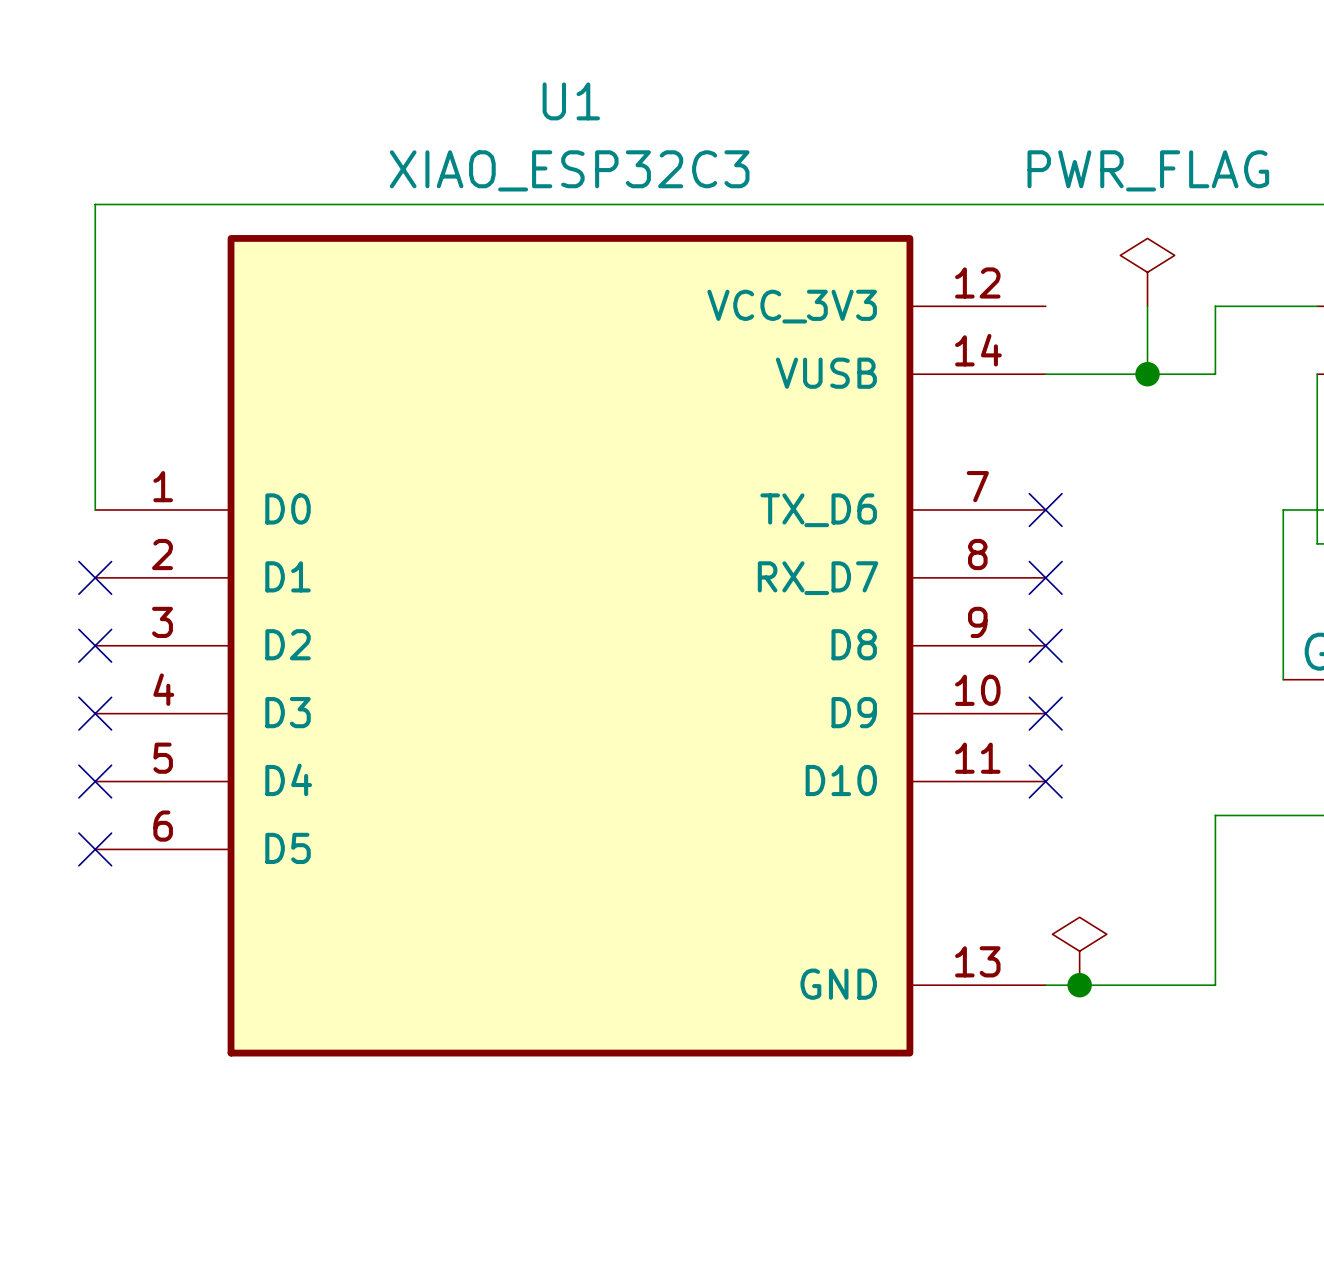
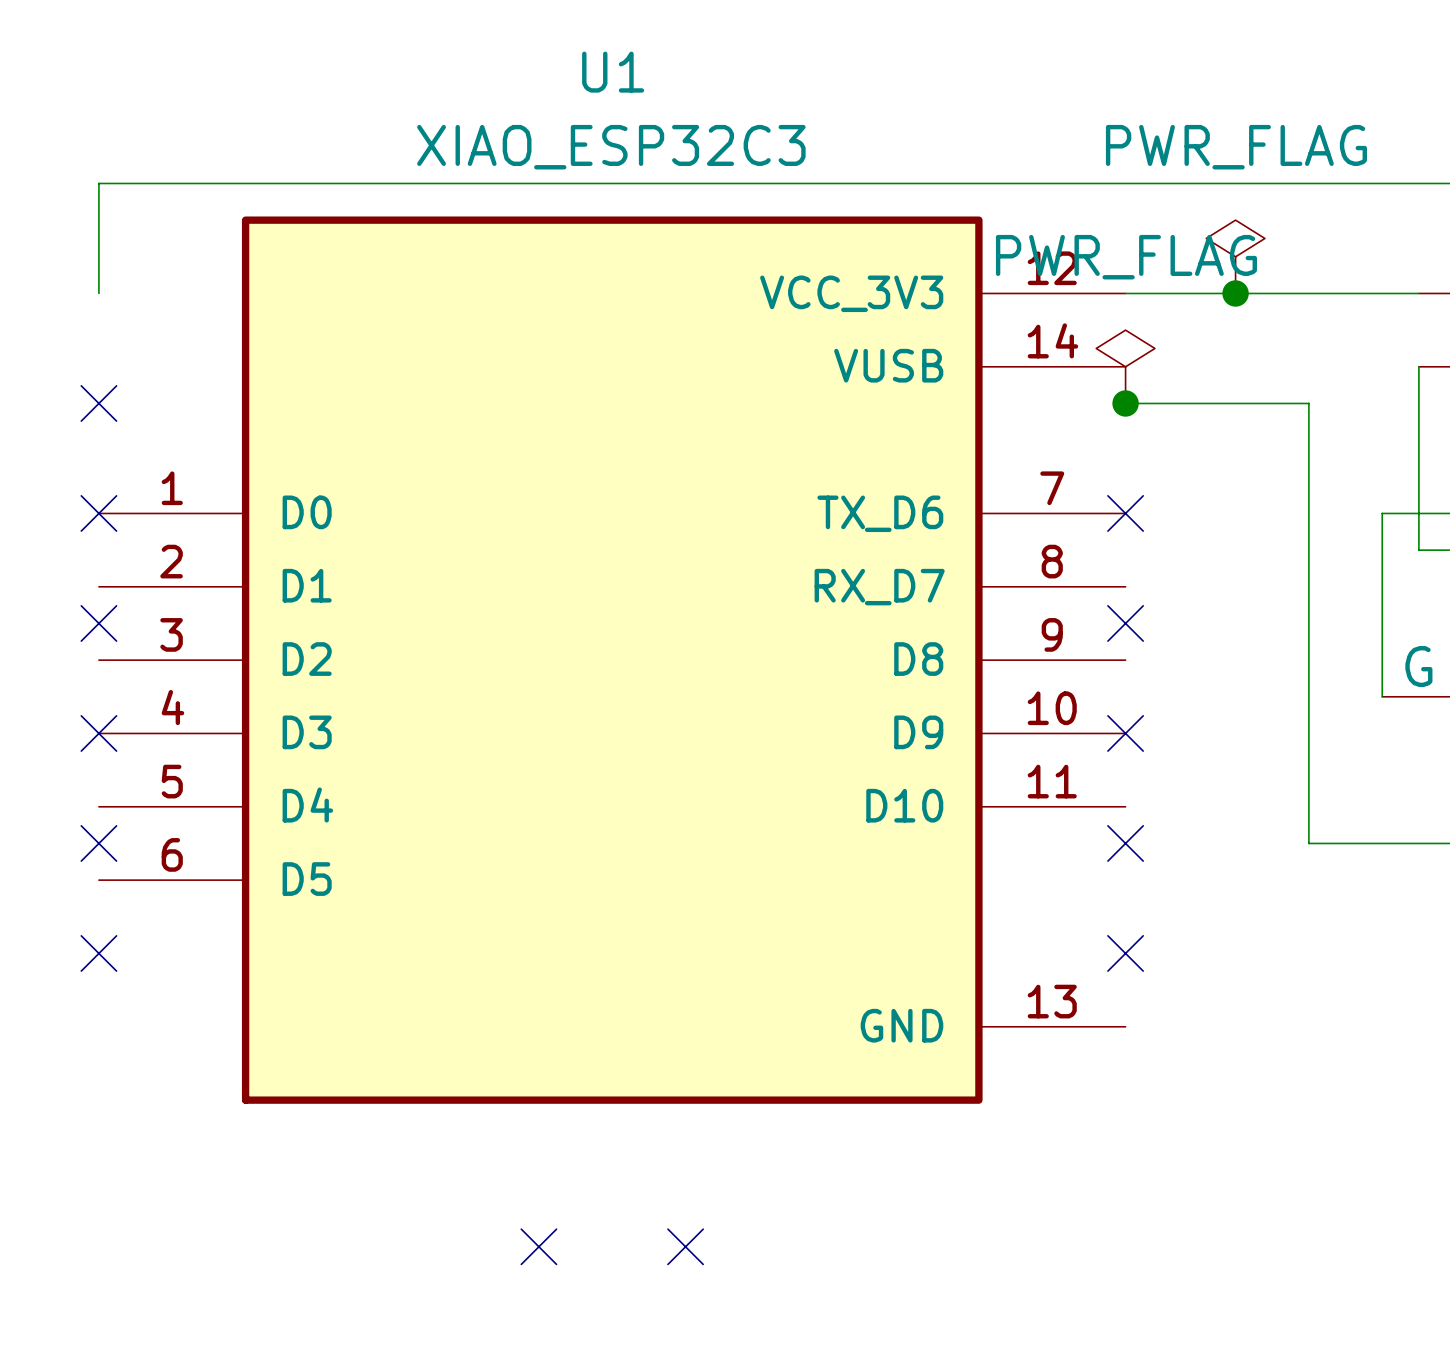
wire: (95, 306) (95, 509) -> none
wire: (1147, 306) (1147, 374) -> none
junction: none -> (1235, 293)
wire: (1215, 306) (1215, 374) (1045, 374) -> (1308, 293) (1125, 293)
power symbol: none -> PWR_FLAG (1125, 366)
junction: (1147, 374) -> none
no-connect mark: none -> (98, 403)
junction: none -> (1125, 403)
no-connect mark: none -> (98, 513)
no-connect mark: (95, 577) -> none
no-connect mark: (1045, 577) -> none
no-connect mark: none -> (98, 623)
no-connect mark: none -> (1125, 623)
no-connect mark: (95, 645) -> none
no-connect mark: (1045, 645) -> none
no-connect mark: (95, 781) -> none
no-connect mark position: (1045, 781) -> (1125, 843)
no-connect mark: none -> (98, 843)
wire: (1215, 815) (1215, 985) (1045, 985) -> (1308, 843) (1308, 403) (1125, 403)
no-connect mark: (95, 849) -> none
no-connect mark: none -> (98, 953)
no-connect mark: none -> (1125, 953)
power symbol: (1079, 951) -> none
junction: (1079, 985) -> none
no-connect mark: none -> (538, 1246)
no-connect mark: none -> (685, 1246)

